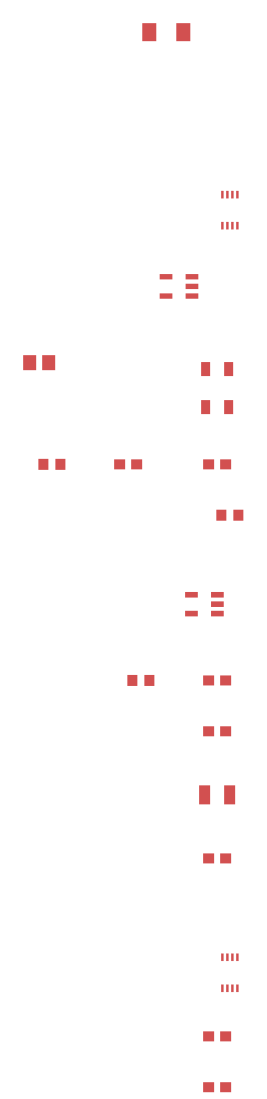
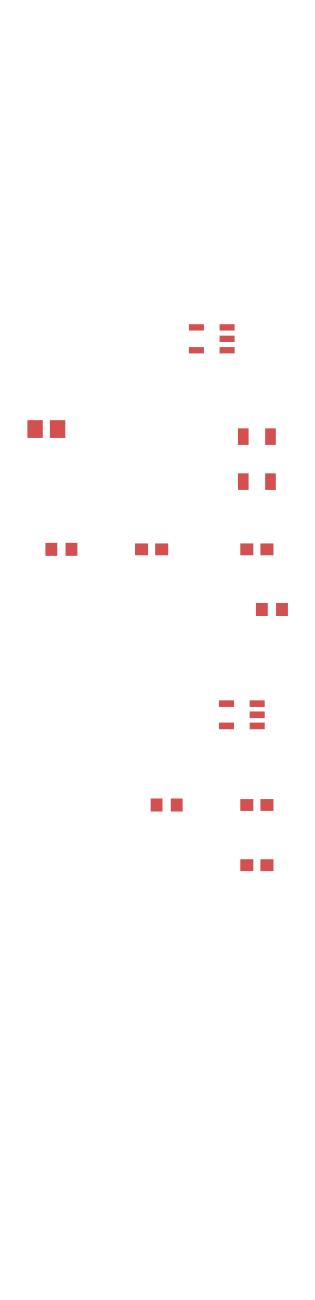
part: (166, 32) -> none
part: (229, 210) -> none
part: (217, 794) -> none
part: (217, 858) -> none
part: (229, 972) -> none
part: (217, 1036) -> none
part: (217, 1087) -> none

